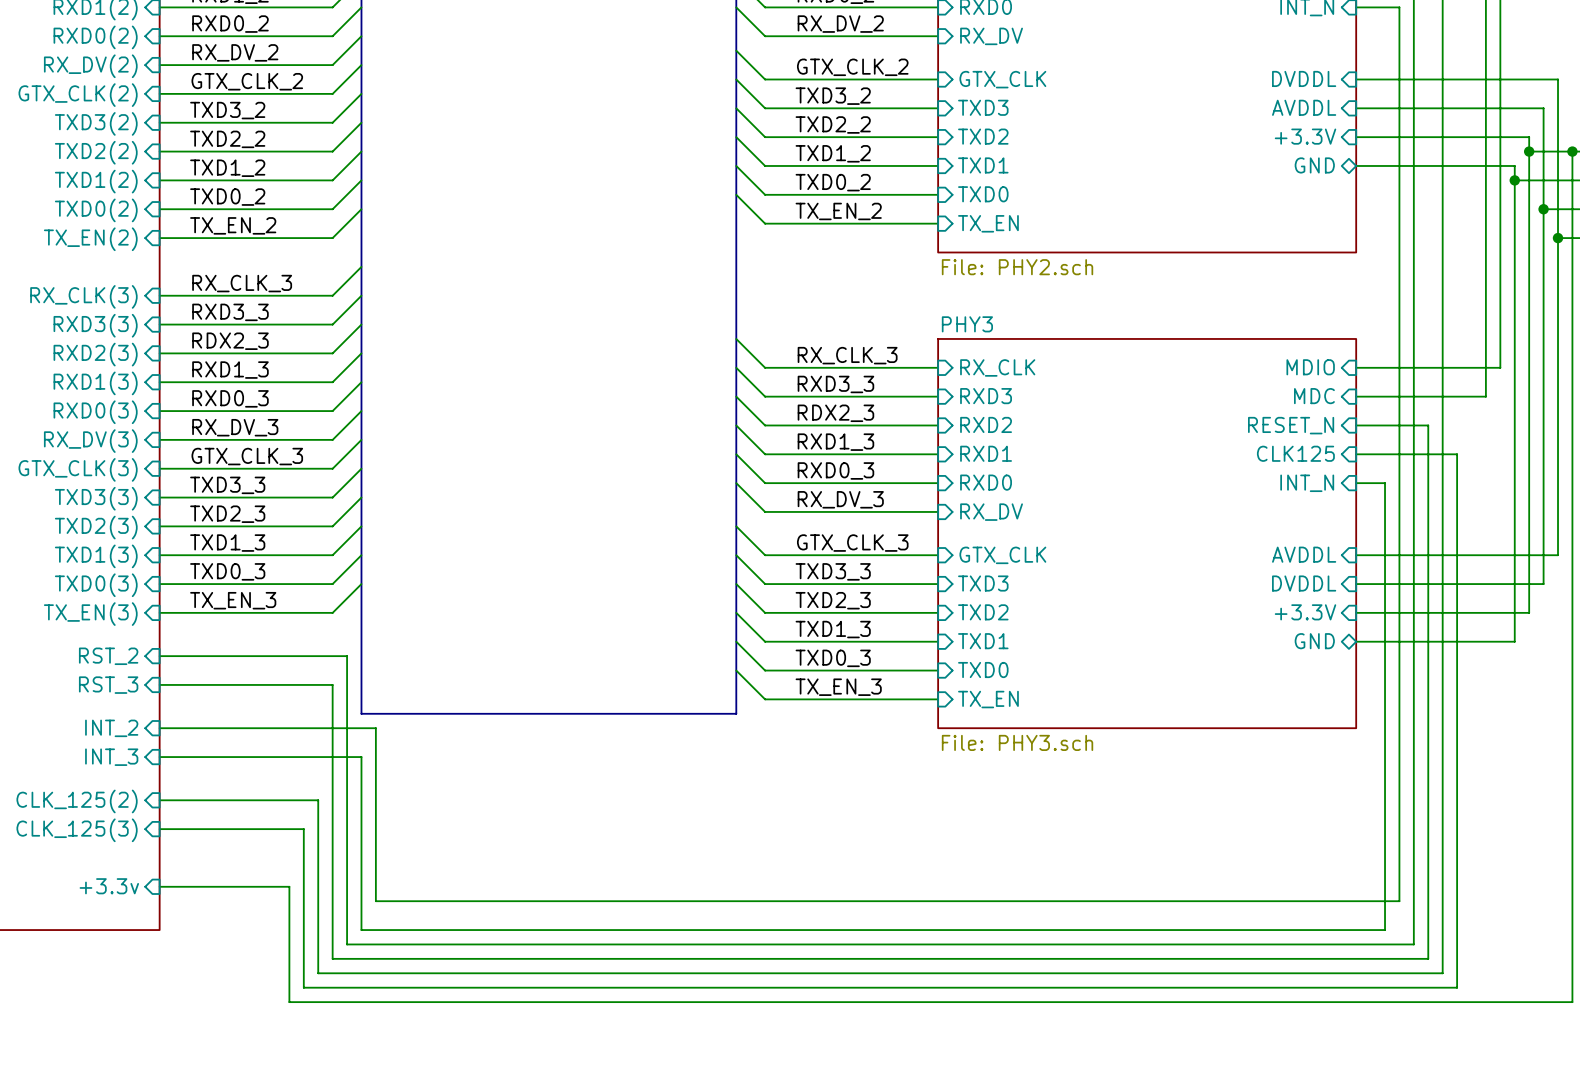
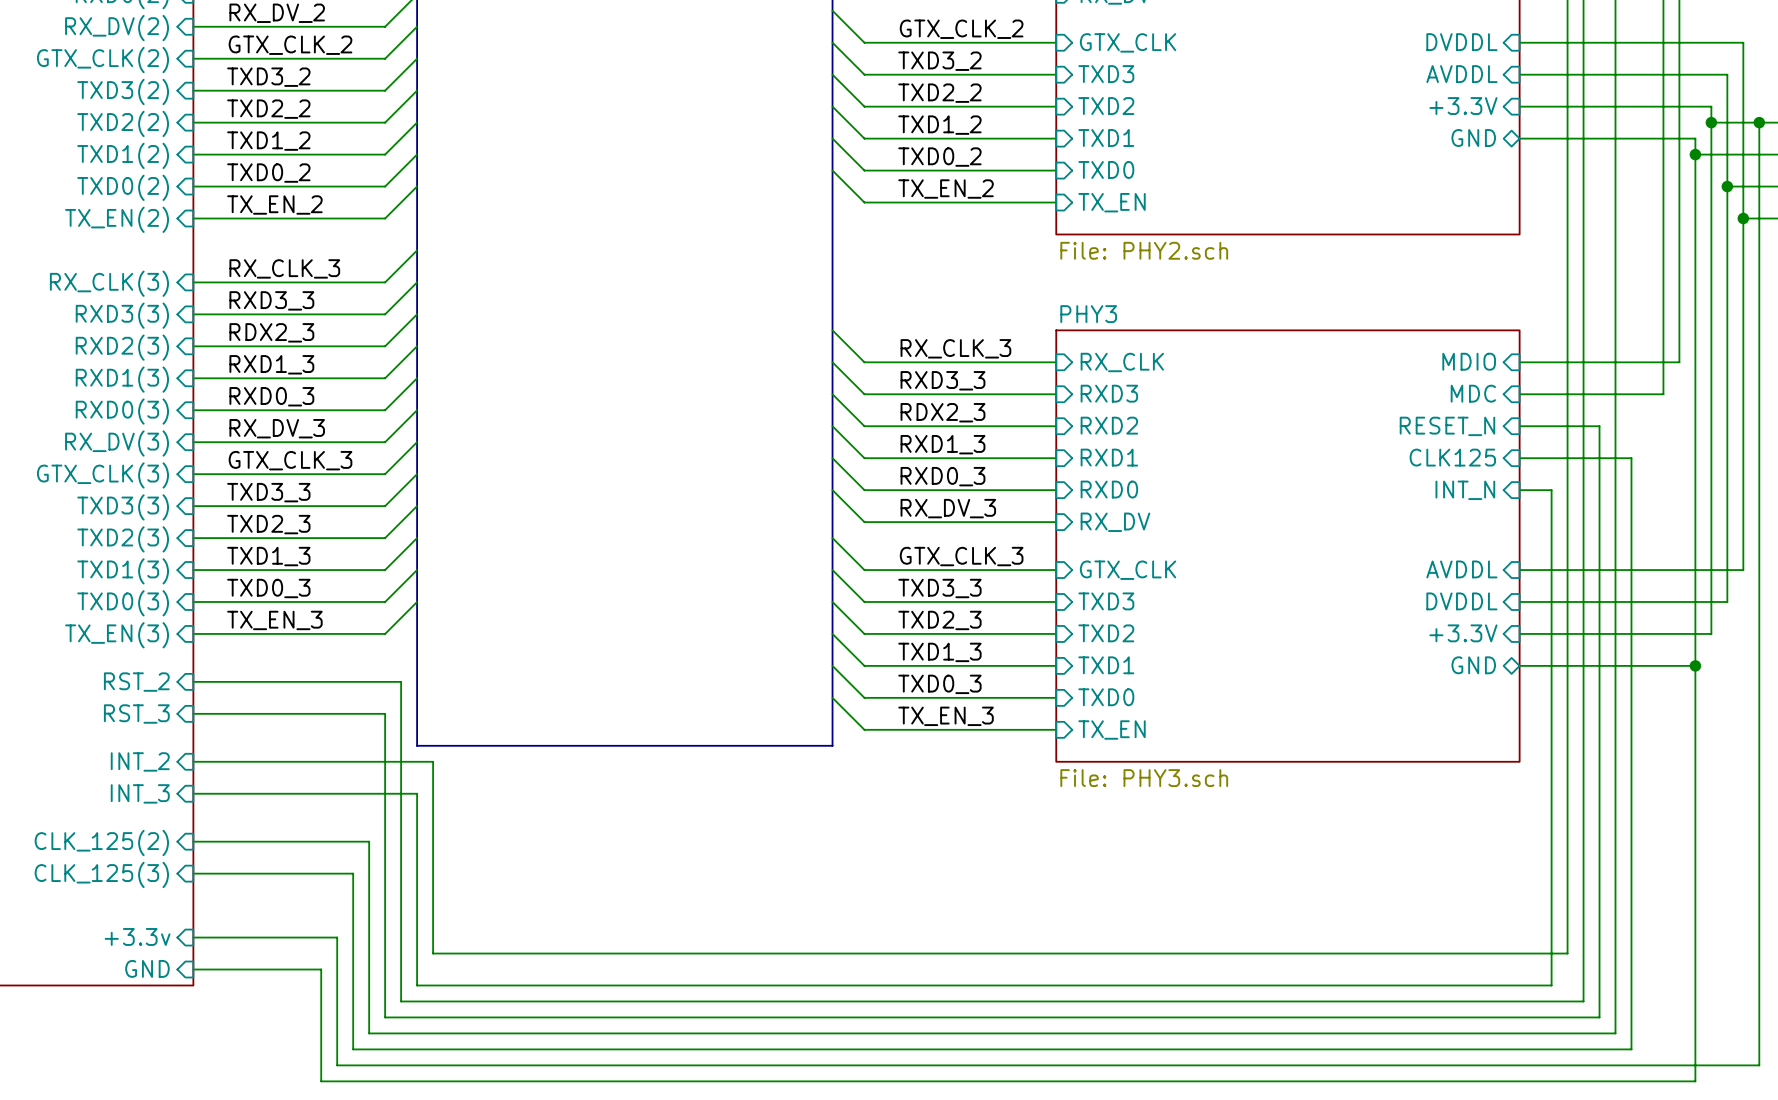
wire: none -> (1695, 665) (1695, 1081) (321, 1081) (321, 969) (193, 969)
junction: none -> (1695, 665)
sheet pin: none -> GND (147, 968)

